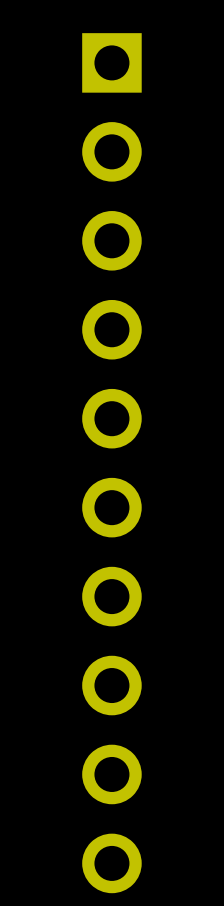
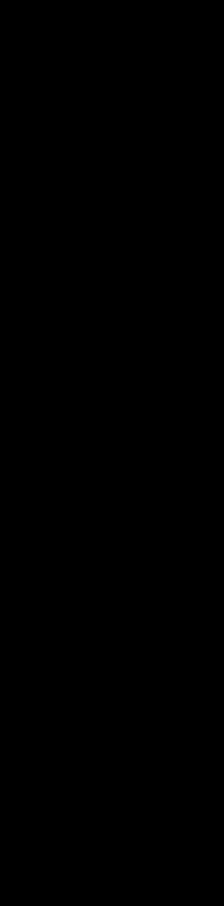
part: (111, 463) -> none

